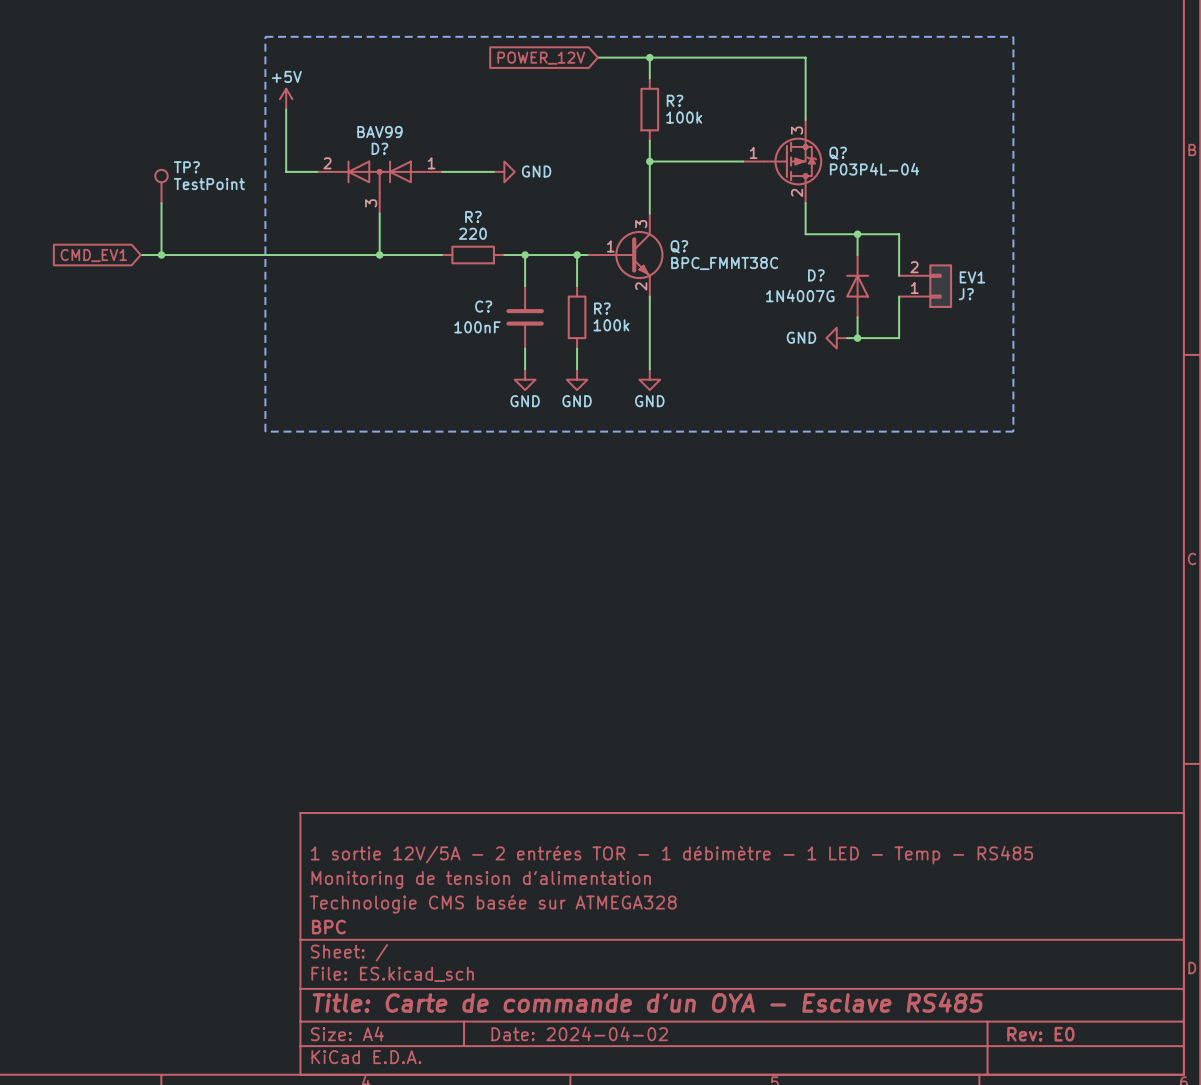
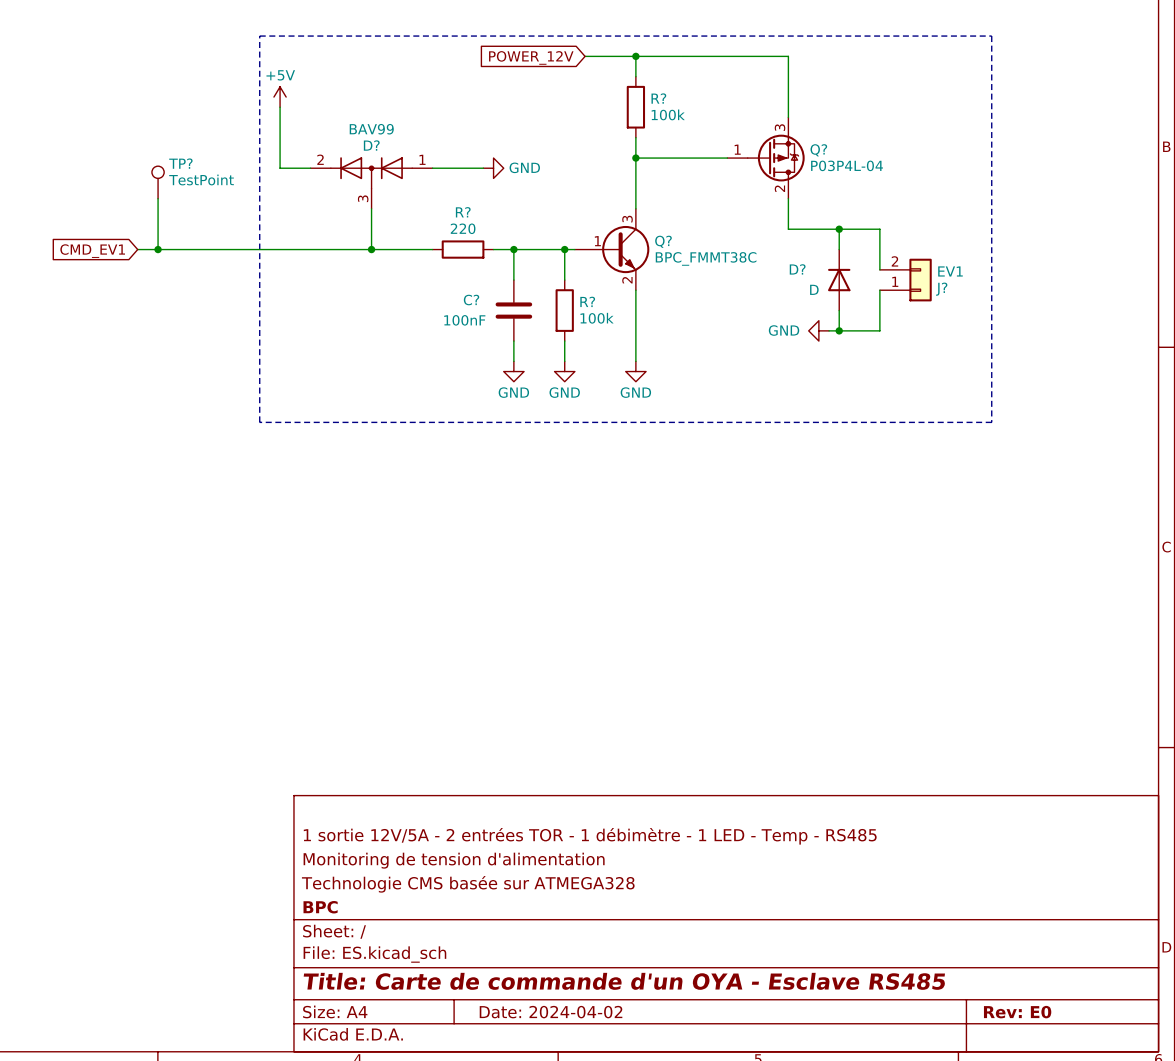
D? value: 1N4007G (800, 295) -> D (814, 289)

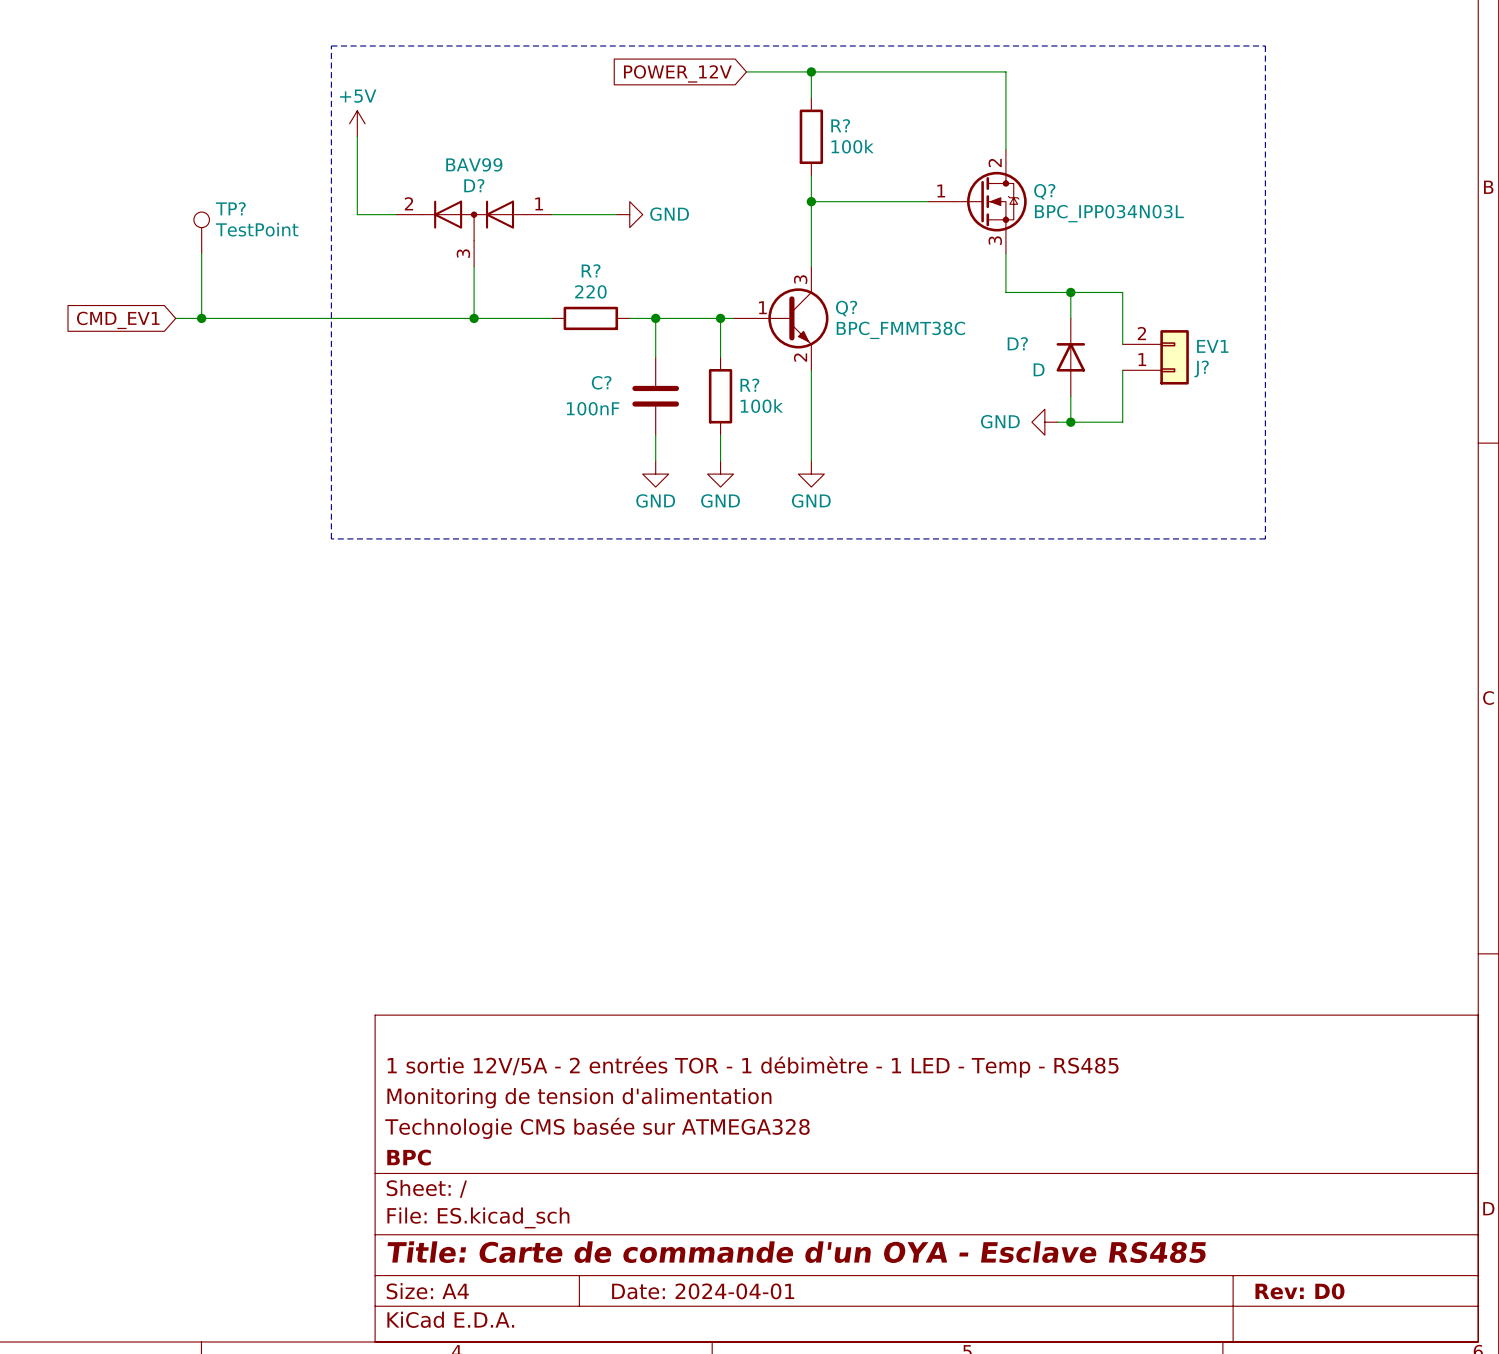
Q? symbol: [727, 117, 805, 199] -> [928, 149, 1027, 254]
Q? value: P03P4L-04 (847, 165) -> BPC_IPP034N03L (1109, 213)
title block: Date: 2024-04-02 (551, 1012) -> Date: 2024-04-01 (703, 1291)
title block: Rev: E0 (1017, 1012) -> Rev: D0 (1299, 1291)

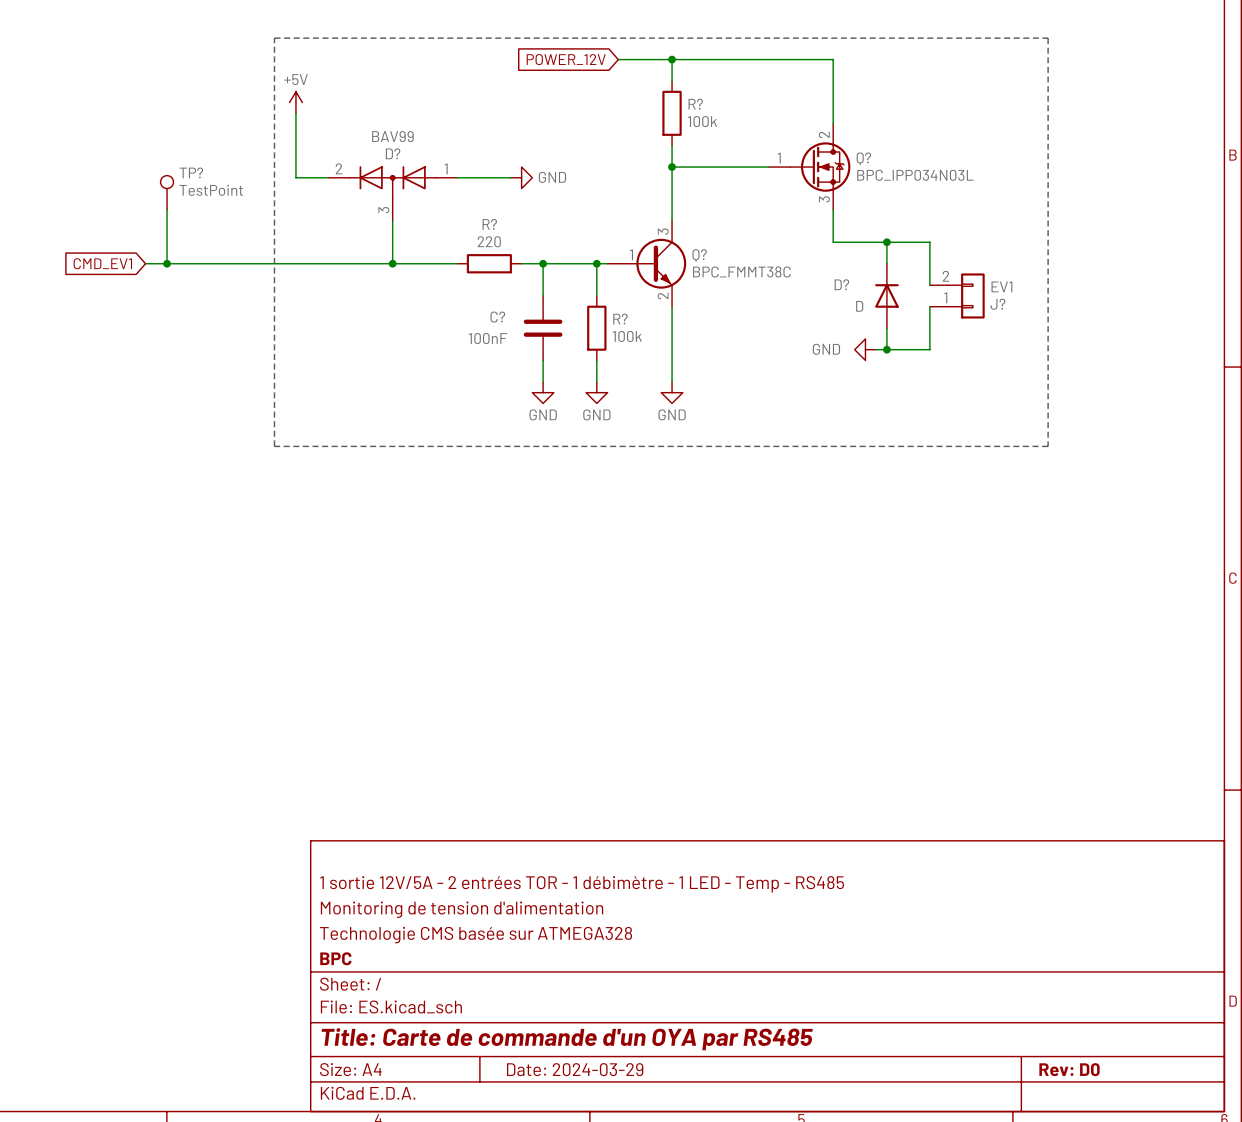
title block: Title: Carte de commande d'un OYA - Esclave RS485 (796, 1252) -> Title: Carte de commande d'un OYA par RS485 (567, 1039)
title block: Date: 2024-04-01 (703, 1291) -> Date: 2024-03-29 (575, 1069)

